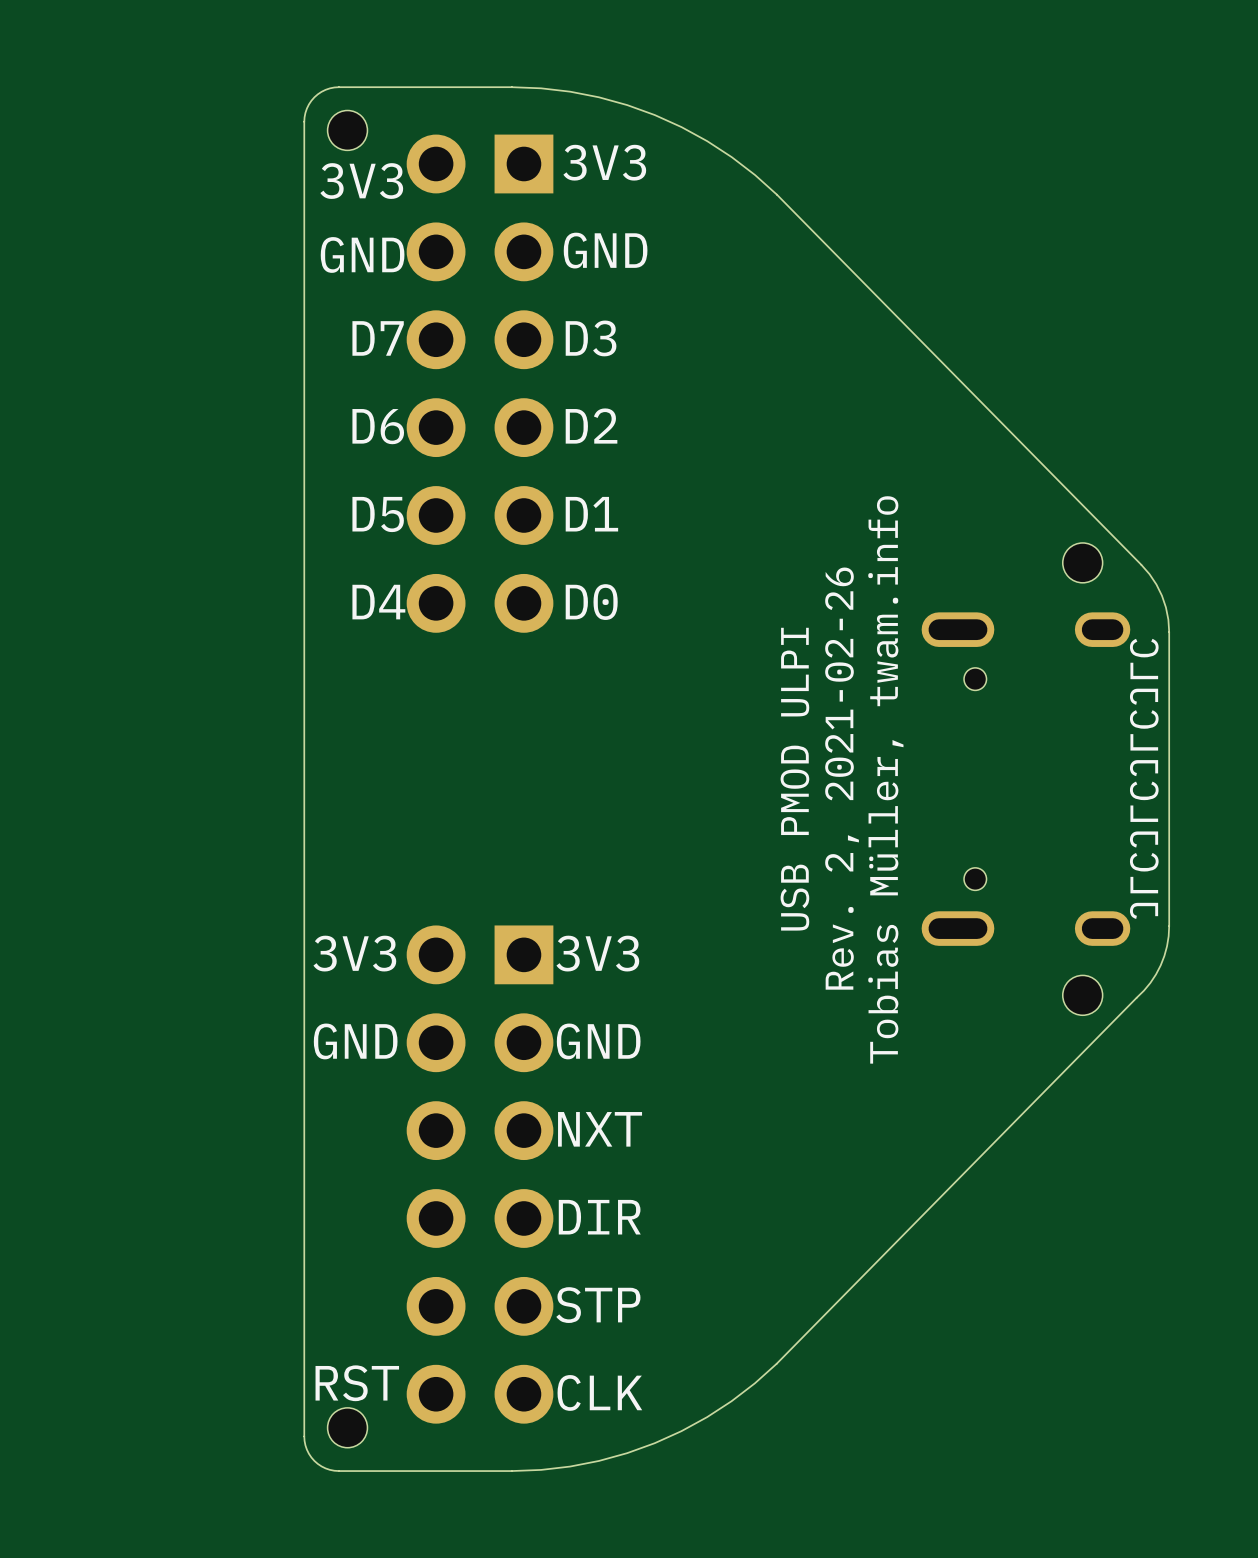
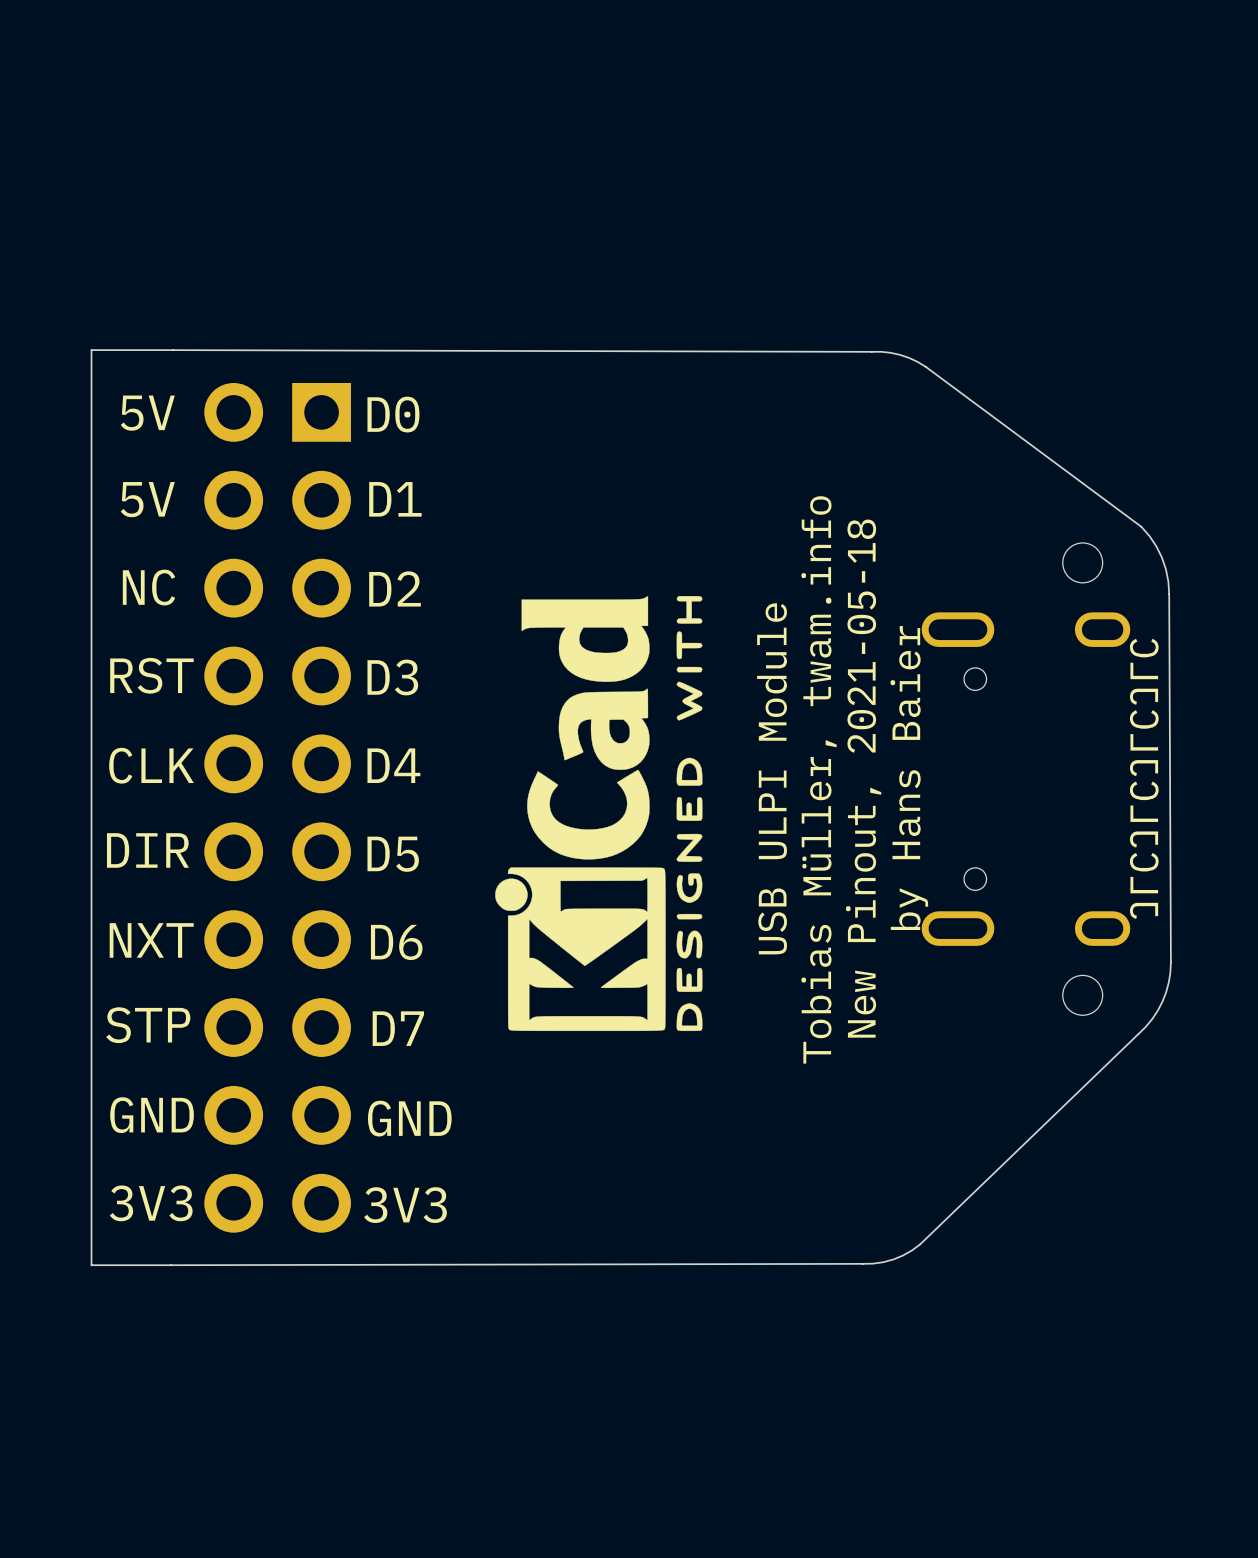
board edge: (511, 87) (334, 87) (325, 89) (314, 97) (308, 104) (304, 117) (304, 1436) (305, 1445) (311, 1457) (321, 1466) (334, 1470) (511, 1471) (570, 1466) (598, 1460) (654, 1443) (707, 1417) (754, 1383) (776, 1363) (1143, 990) (1160, 965) (1168, 936) (1169, 632) (1165, 607) (1156, 584) (1149, 574) (776, 194) (731, 157) (681, 127) (627, 105) (570, 91) (511, 87) -> (172, 350) (881, 351) (899, 354) (925, 366) (1141, 526) (1149, 536) (1161, 557) (1168, 581) (1169, 594) (1170, 962) (1166, 992) (1152, 1019) (920, 1244) (902, 1255) (883, 1262) (863, 1263) (91, 1265) (91, 350) (172, 350)
part: (347, 130) -> none
text: 3V3 (604, 162) -> none
text: 3V3 (361, 181) -> none
text: GND (605, 250) -> none
text: GND (362, 254) -> none
text position: D7 (378, 338) -> D7 (398, 1028)
text position: D3 (591, 338) -> D3 (392, 677)
part: (480, 383) -> none
text: none -> 5V (147, 413)
text position: D6 (378, 426) -> D6 (396, 942)
text position: D2 (591, 426) -> D2 (395, 588)
text: none -> 5V (147, 499)
text position: D5 (378, 514) -> D5 (393, 854)
text position: D1 (591, 514) -> D1 (395, 499)
text: none -> NC (149, 587)
drawing: none -> [495, 595, 703, 1032]
text position: D4 (378, 602) -> D4 (393, 765)
text position: D0 (591, 602) -> D0 (393, 414)
text: Rev. 2, 2021-02-26 (842, 778) -> New Pinout, 2021-05-18 (863, 778)
text: none -> by Hans Baier (909, 778)
text: USB PMOD ULPI (794, 779) -> USB ULPI Module (772, 778)
text position: Tobias Müller, twam.info (885, 779) -> Tobias Müller, twam.info (819, 779)
part: none -> (277, 807)
text: 3V3 (354, 953) -> none
text: 3V3 (597, 953) -> none
text position: GND (355, 1041) -> GND (409, 1118)
text: GND (598, 1041) -> none
text: none -> GND (152, 1115)
text position: NXT (600, 1129) -> NXT (151, 940)
part: (480, 1174) -> none
text: none -> 3V3 (151, 1203)
text: none -> 3V3 (405, 1205)
text position: DIR (599, 1217) -> DIR (147, 850)
text position: STP (598, 1305) -> STP (148, 1025)
text position: RST (357, 1383) -> RST (151, 675)
text position: CLK (599, 1392) -> CLK (151, 765)
part: (347, 1427) -> none

